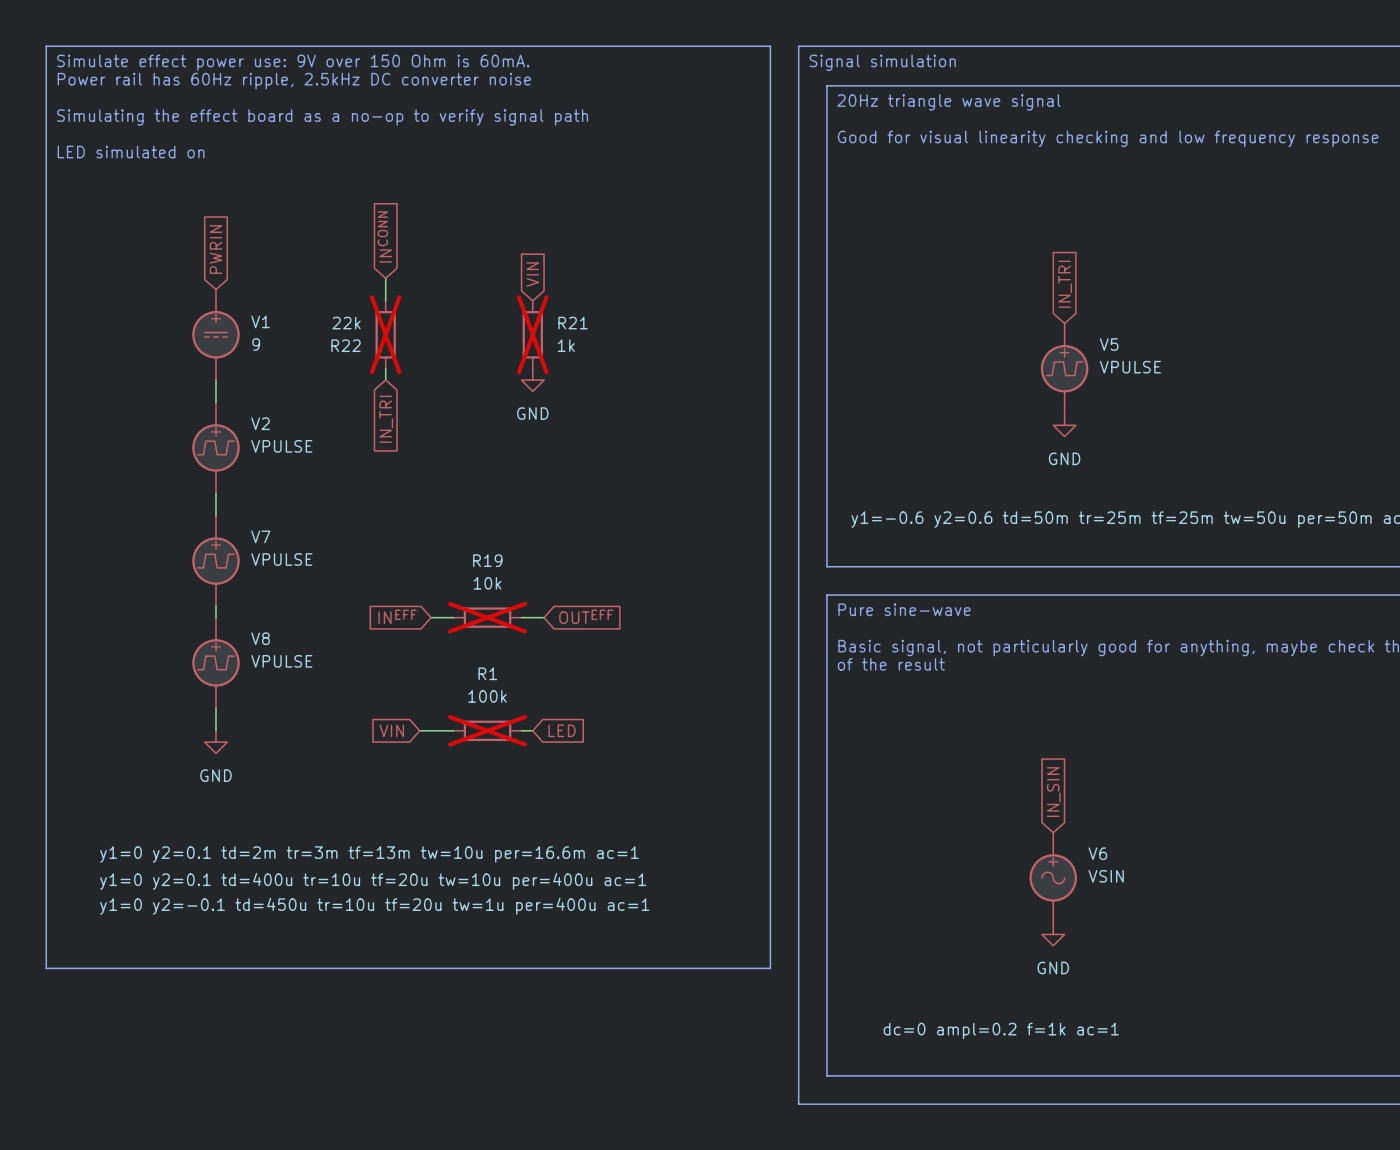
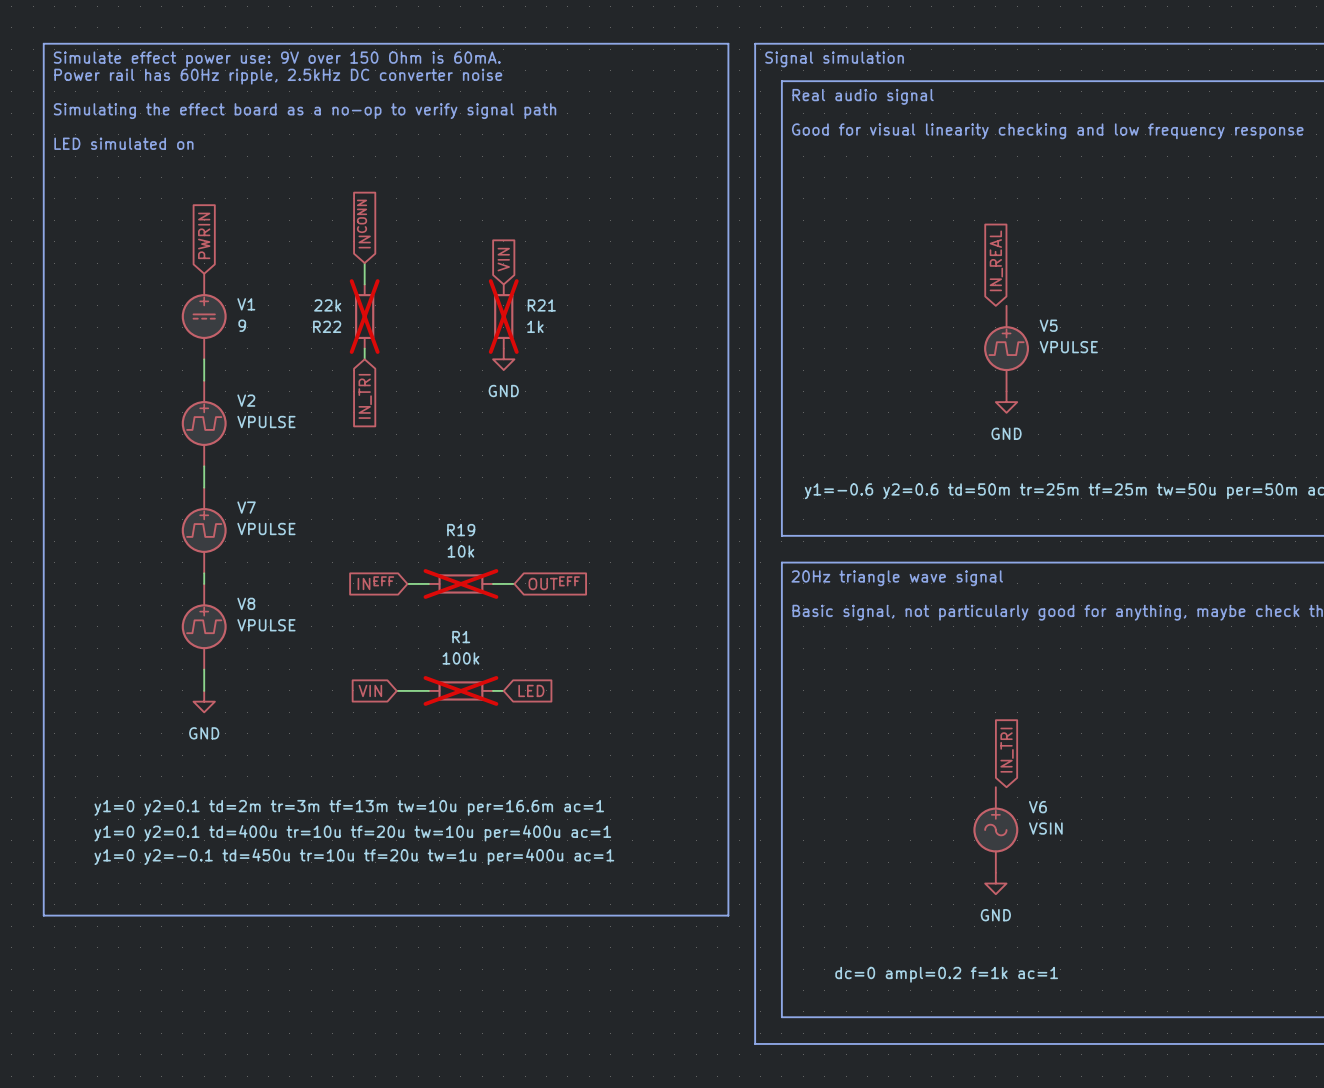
text: 20Hz triangle wave signal (948, 102) -> Real audio signal (863, 96)
global label: IN_TRI (1065, 284) -> IN_REAL (996, 260)
text: Pure sine-wave (904, 609) -> 20Hz triangle wave signal (897, 578)
text: of the result (891, 664) -> none
global label: IN_SIN (1053, 792) -> IN_TRI (1007, 750)

